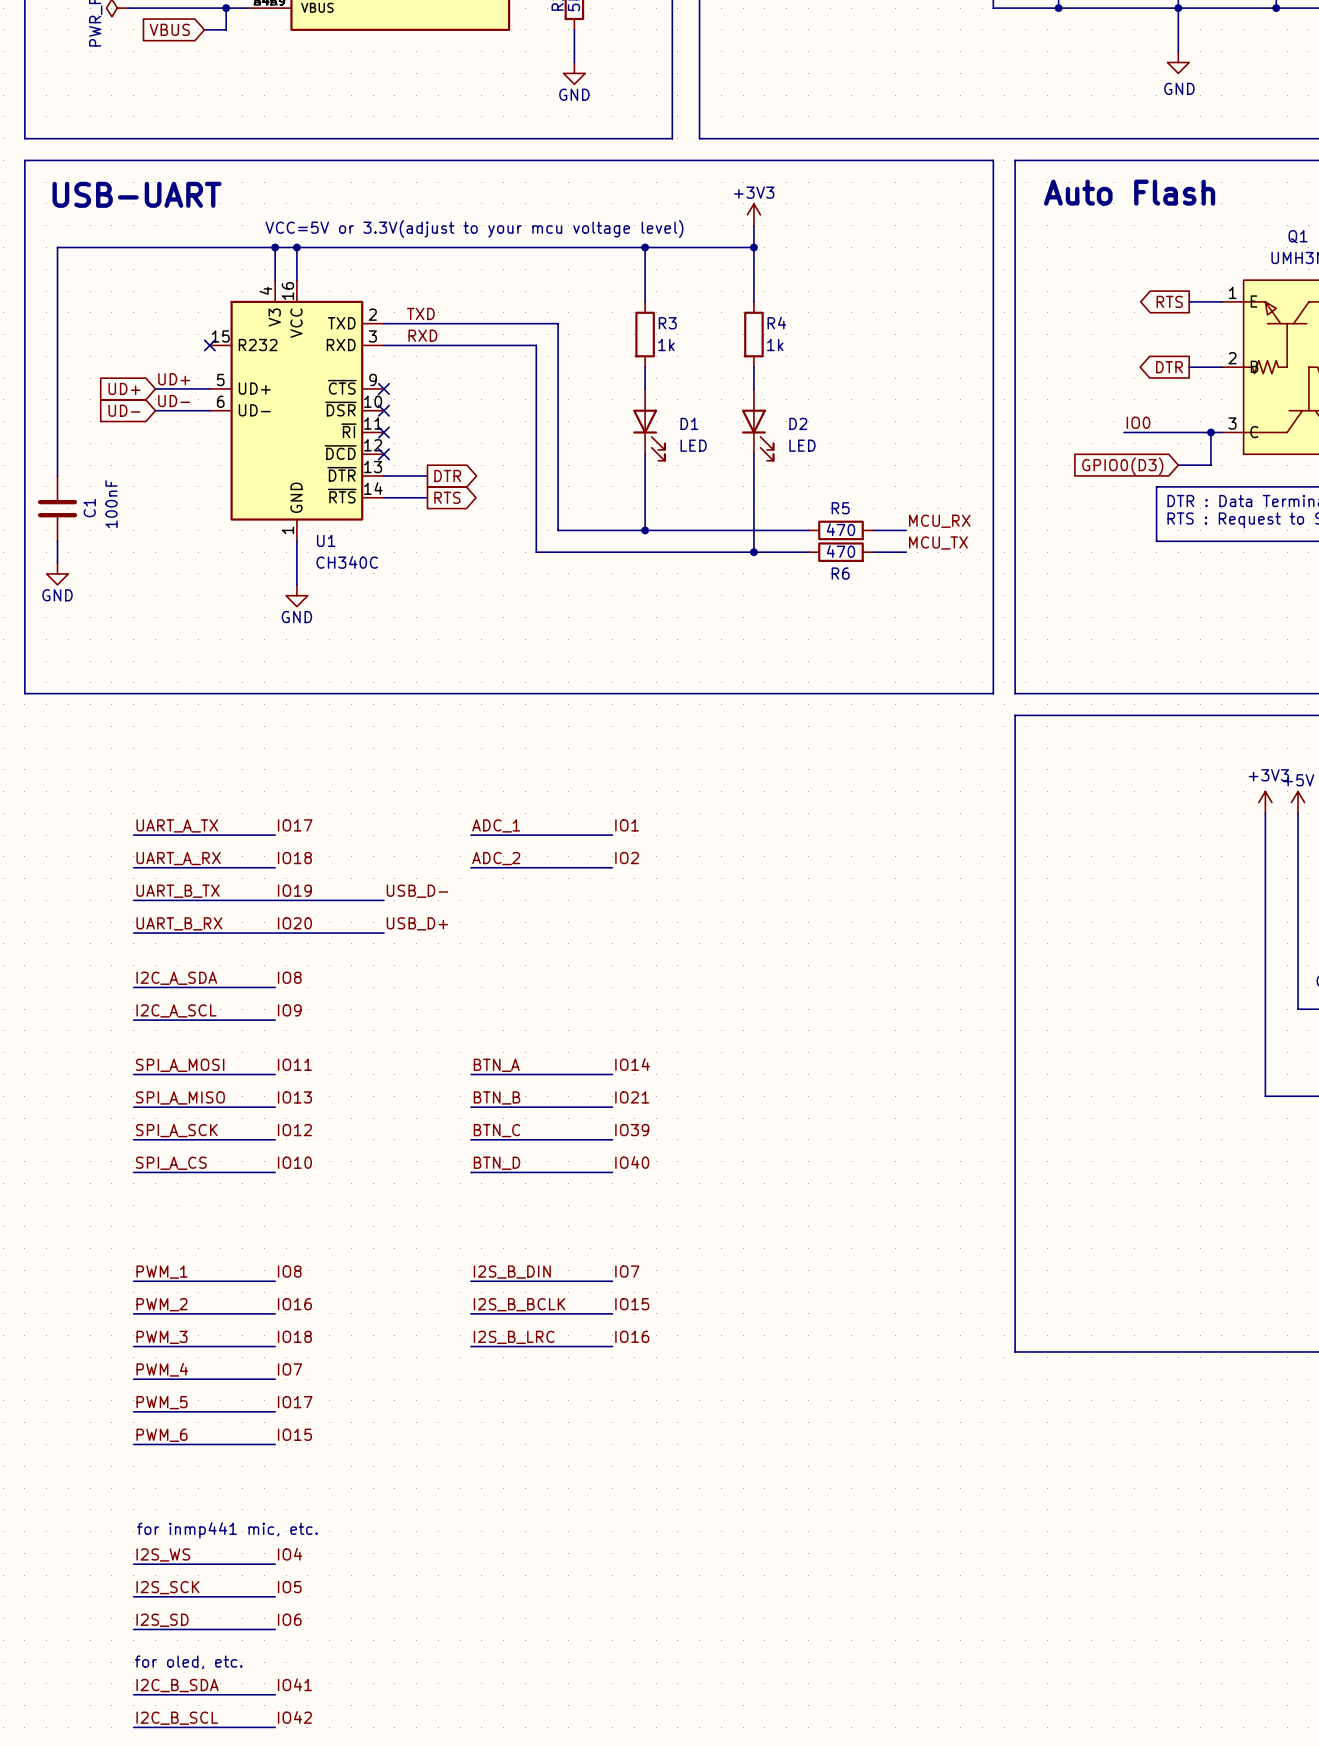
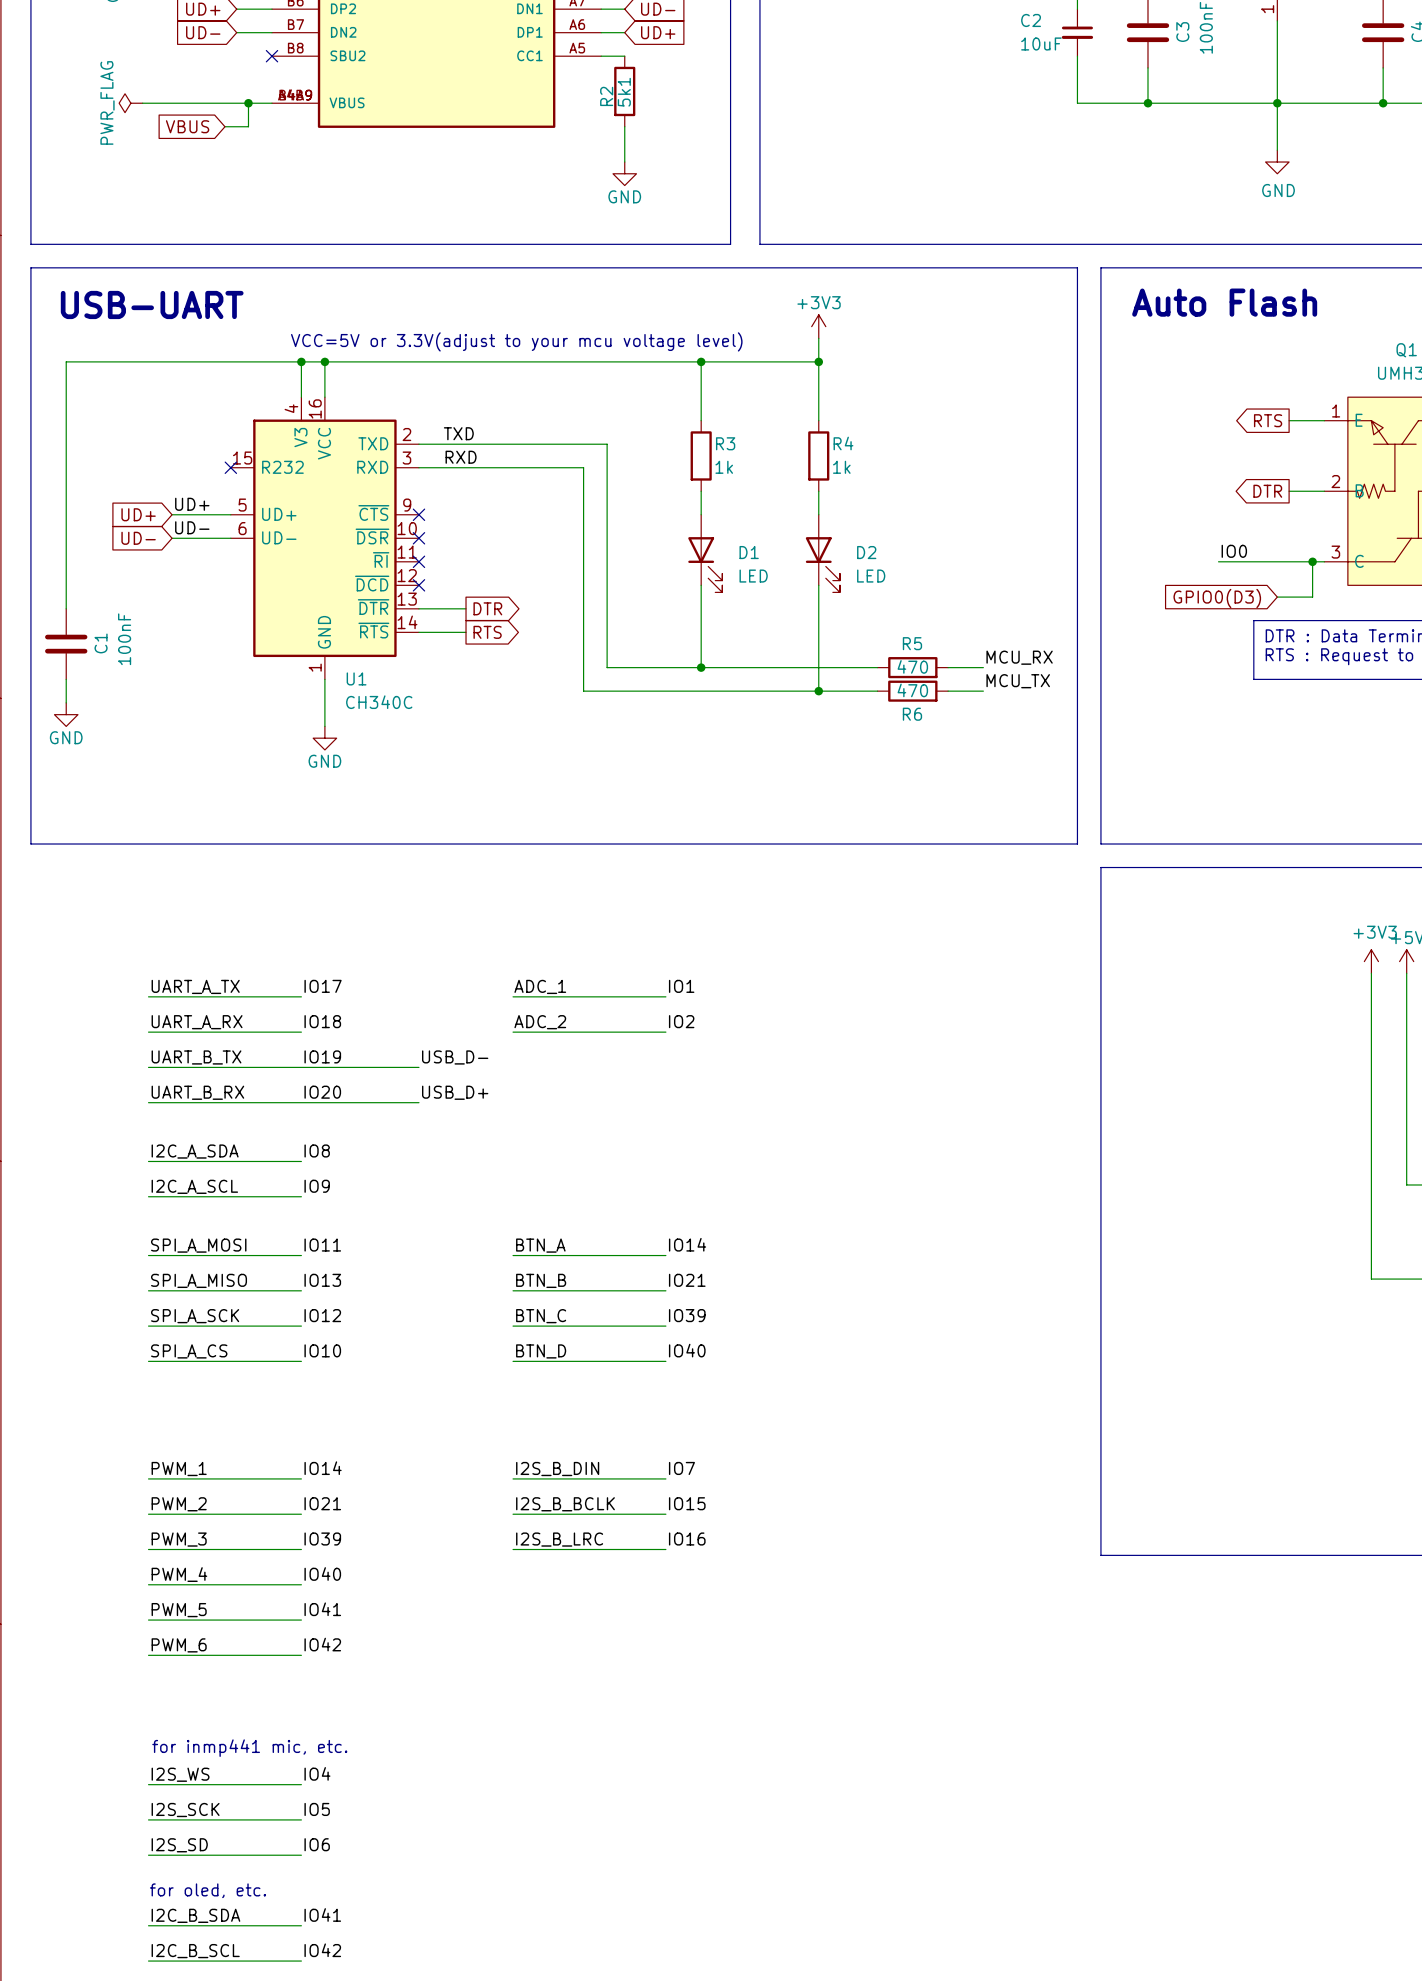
label: IO8 (289, 1271) -> IO14 (323, 1468)
label: IO16 (294, 1304) -> IO21 (322, 1503)
label: IO18 (294, 1336) -> IO39 (322, 1539)
label: IO7 (289, 1369) -> IO40 (322, 1574)
label: IO17 (295, 1402) -> IO41 (322, 1609)
label: IO15 (294, 1434) -> IO42 (322, 1644)

